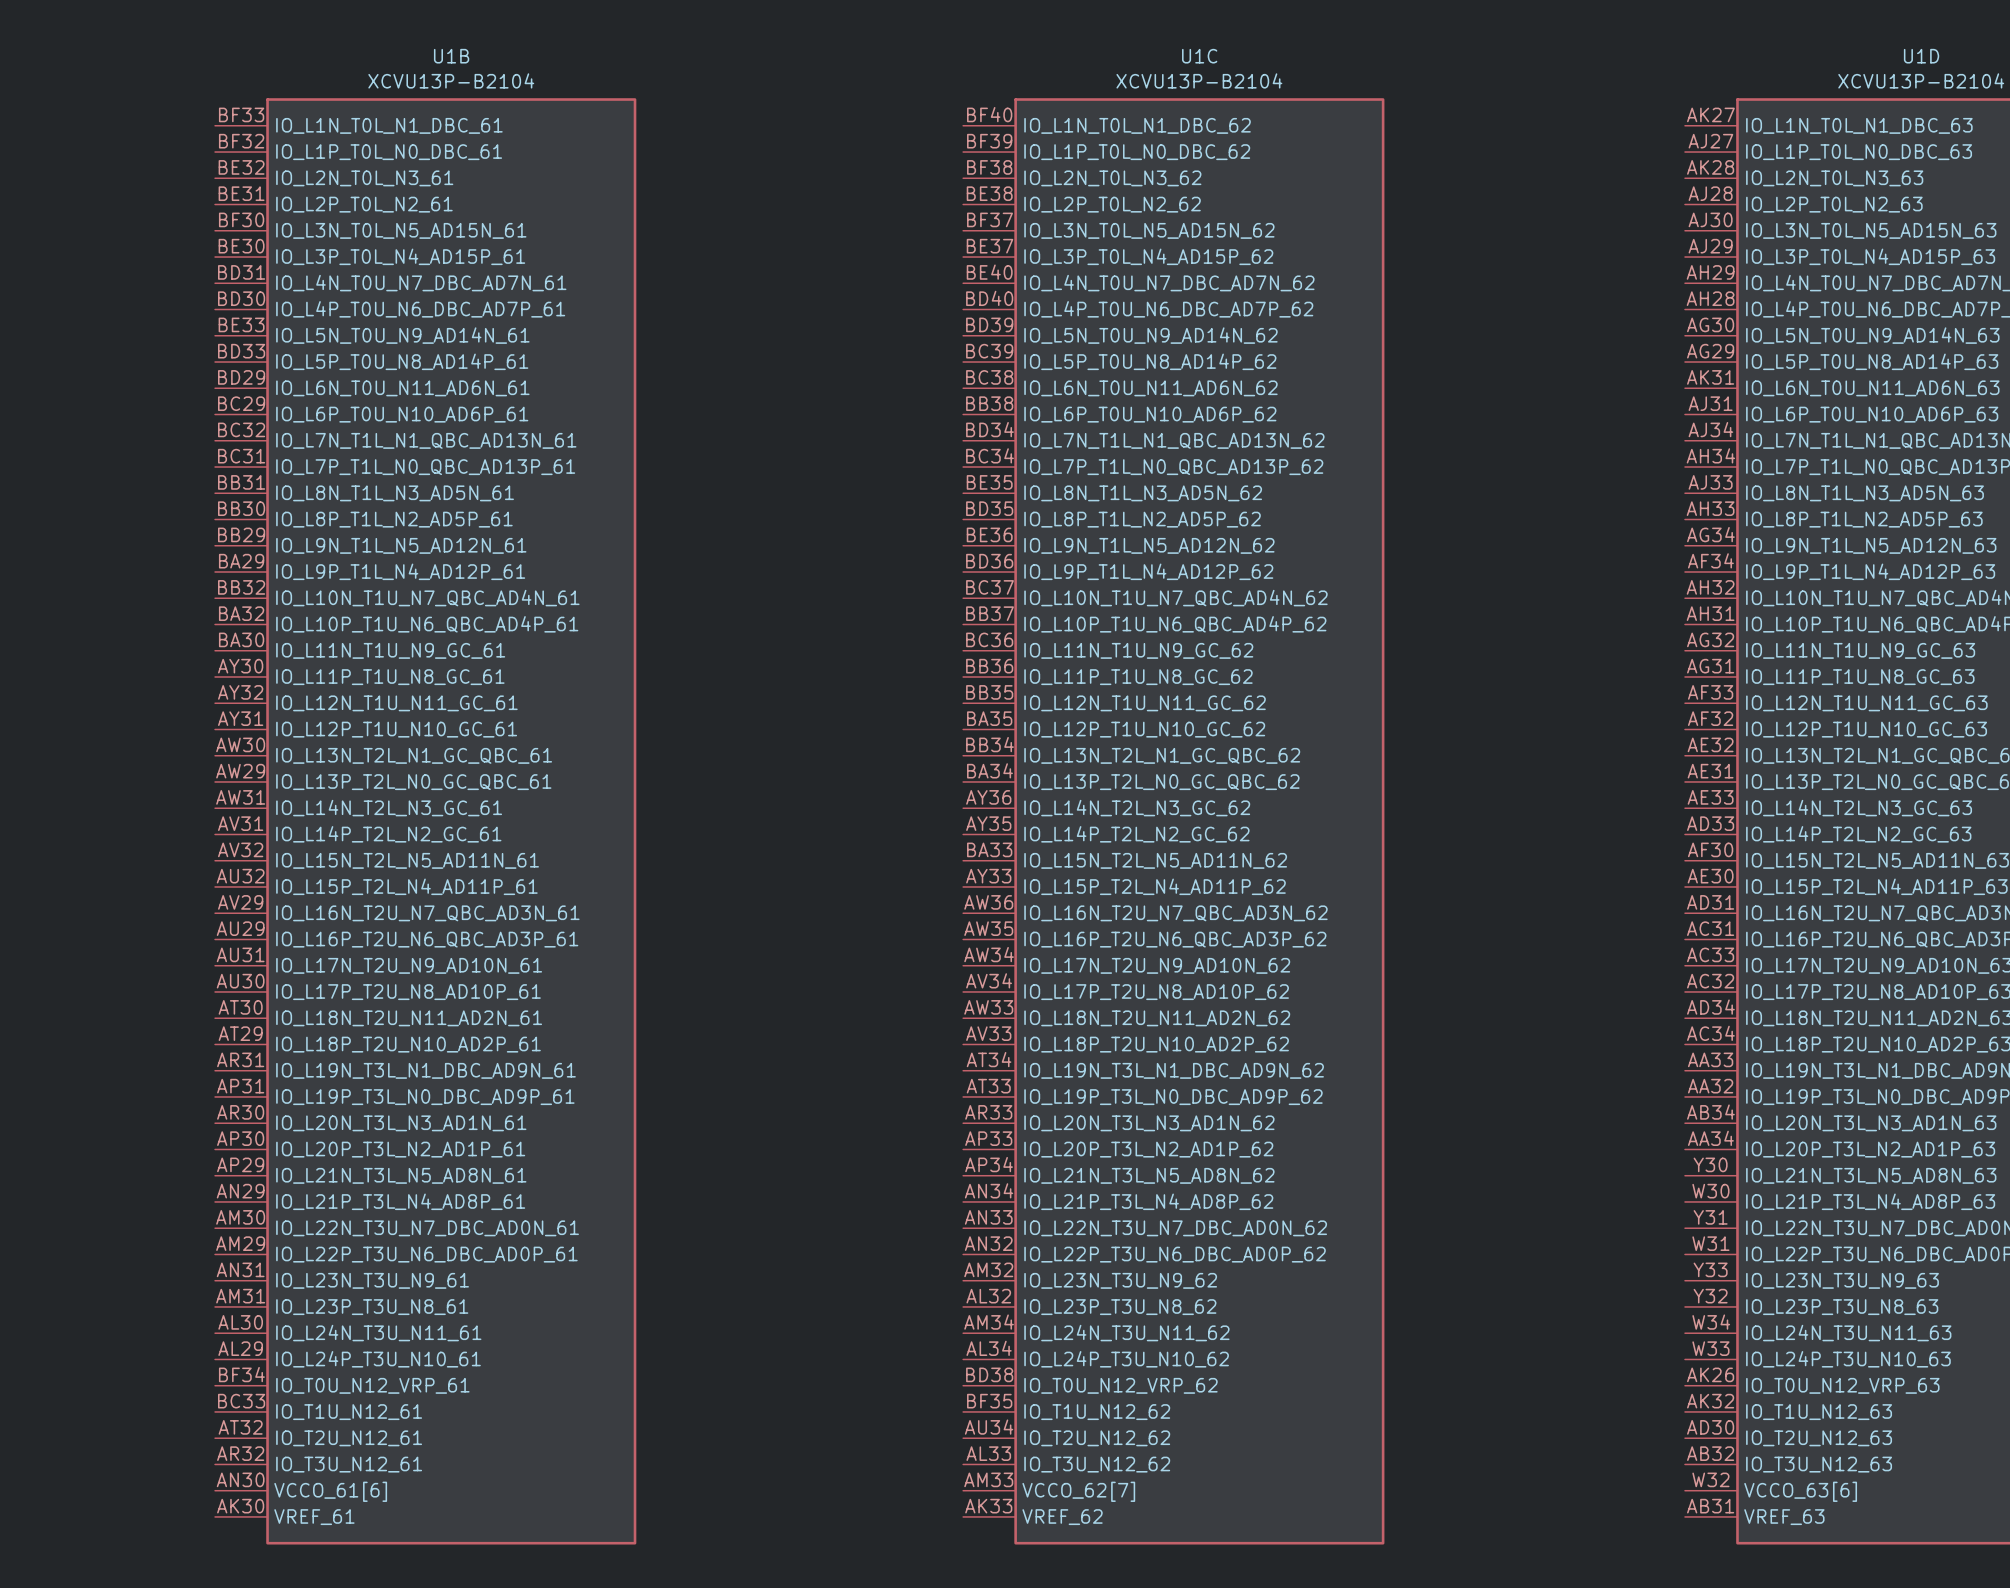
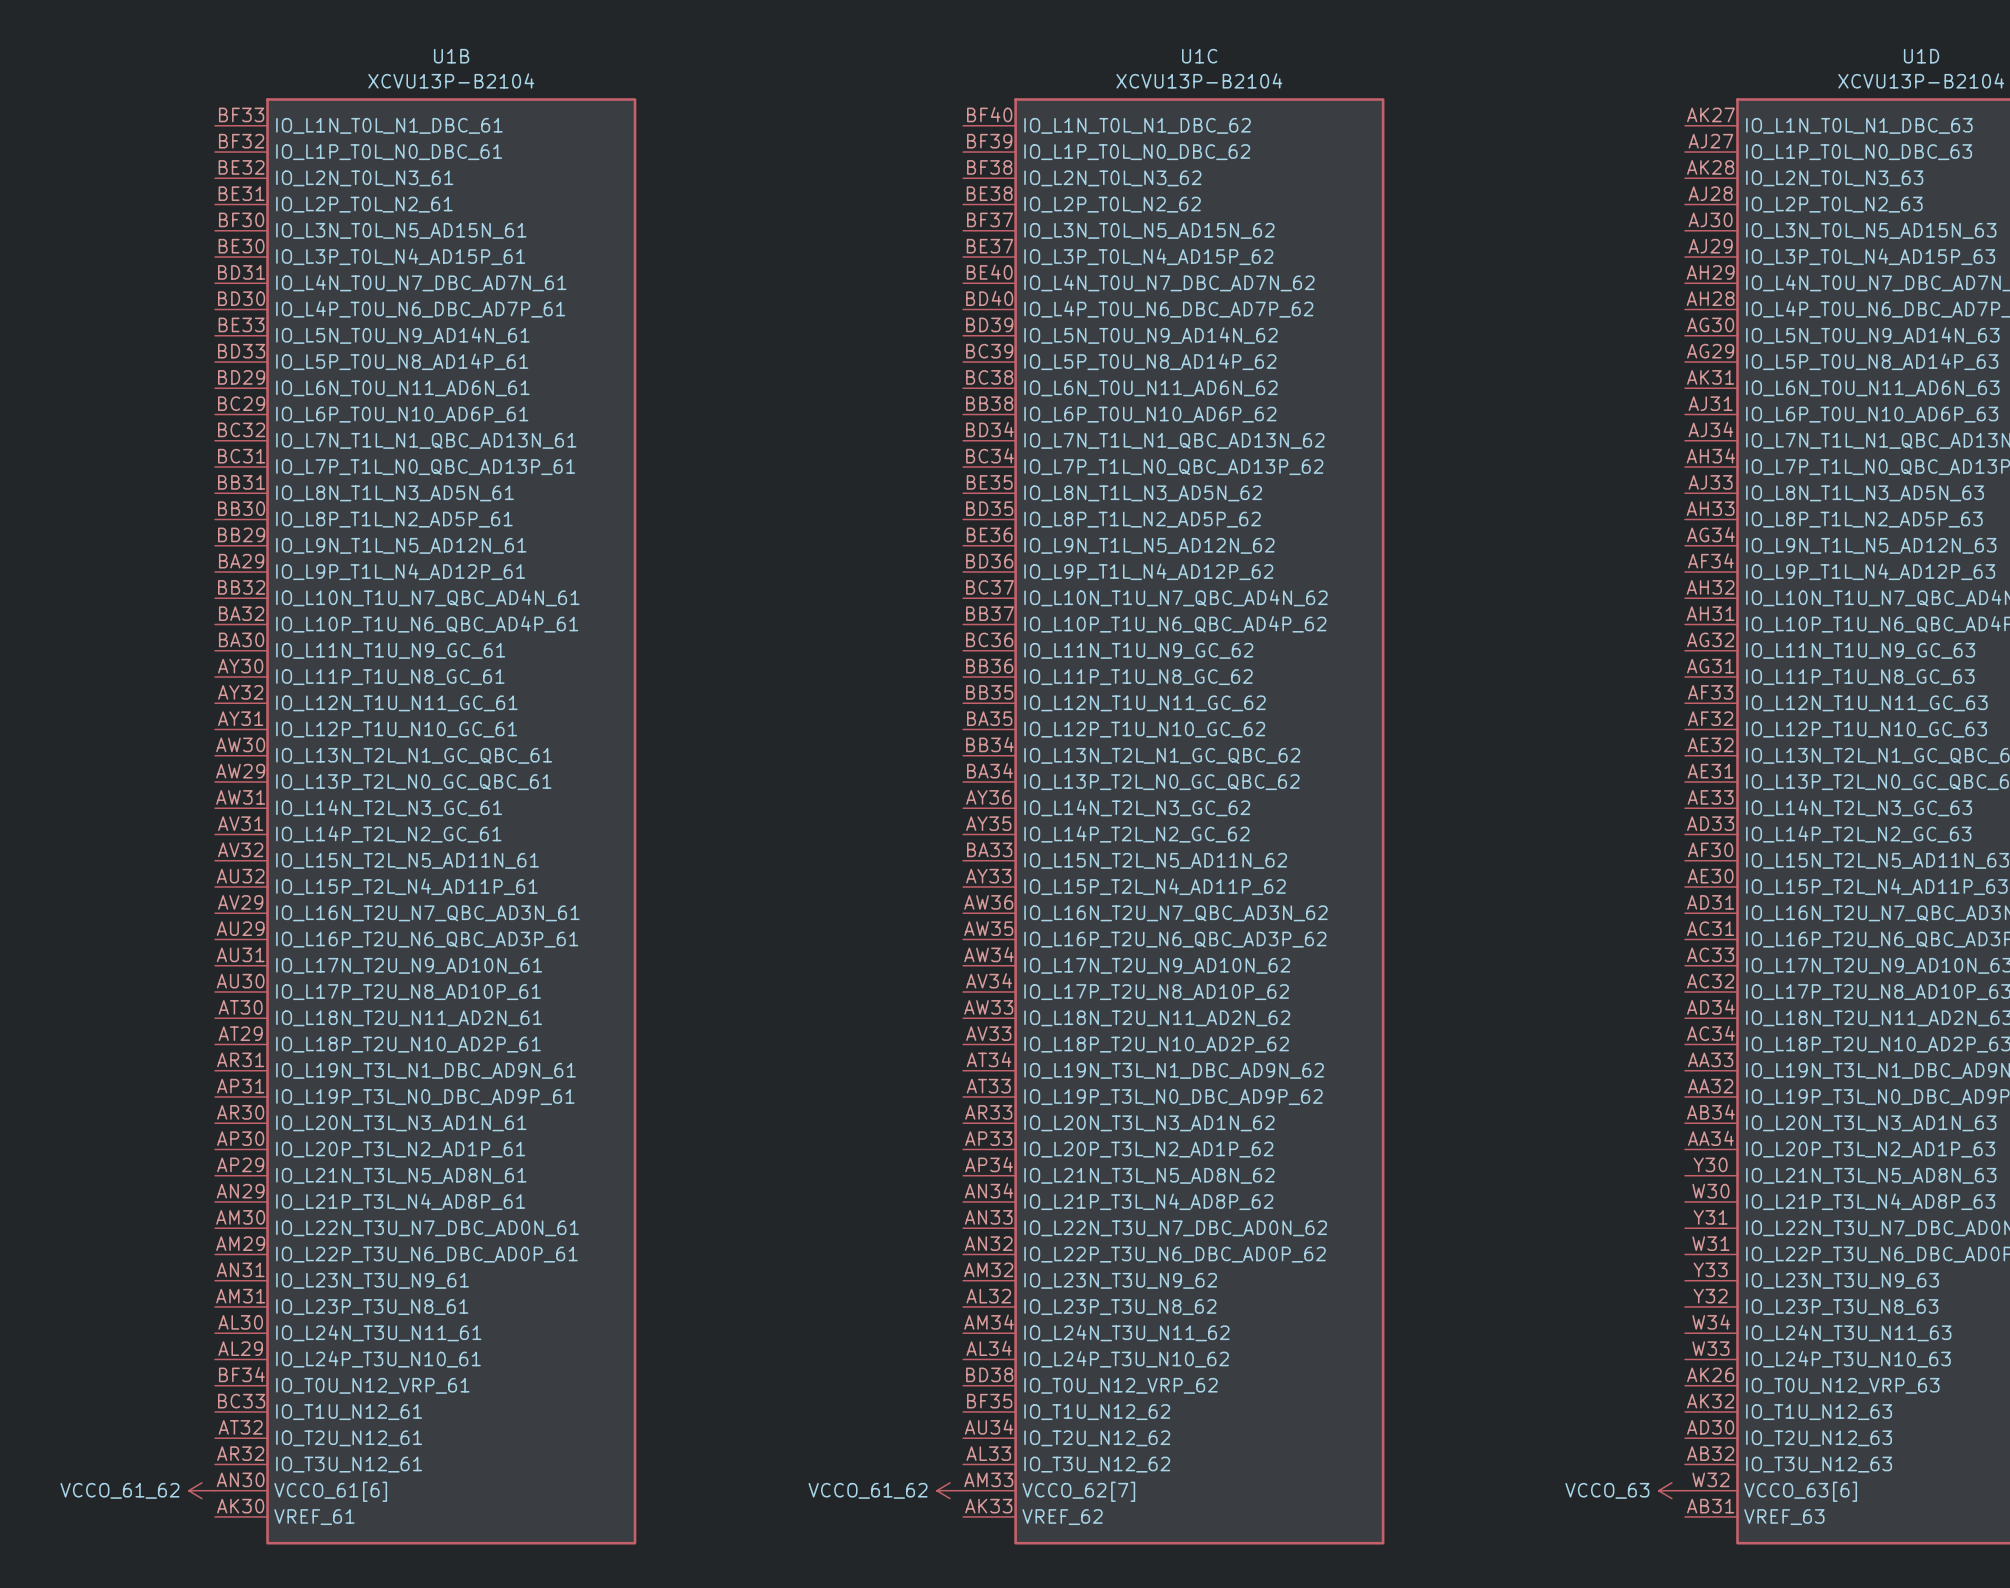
power symbol: none -> VCCO_61_62 (201, 1490)
power symbol: none -> VCCO_61_62 (950, 1490)
power symbol: none -> VCCO_63 (1671, 1490)

